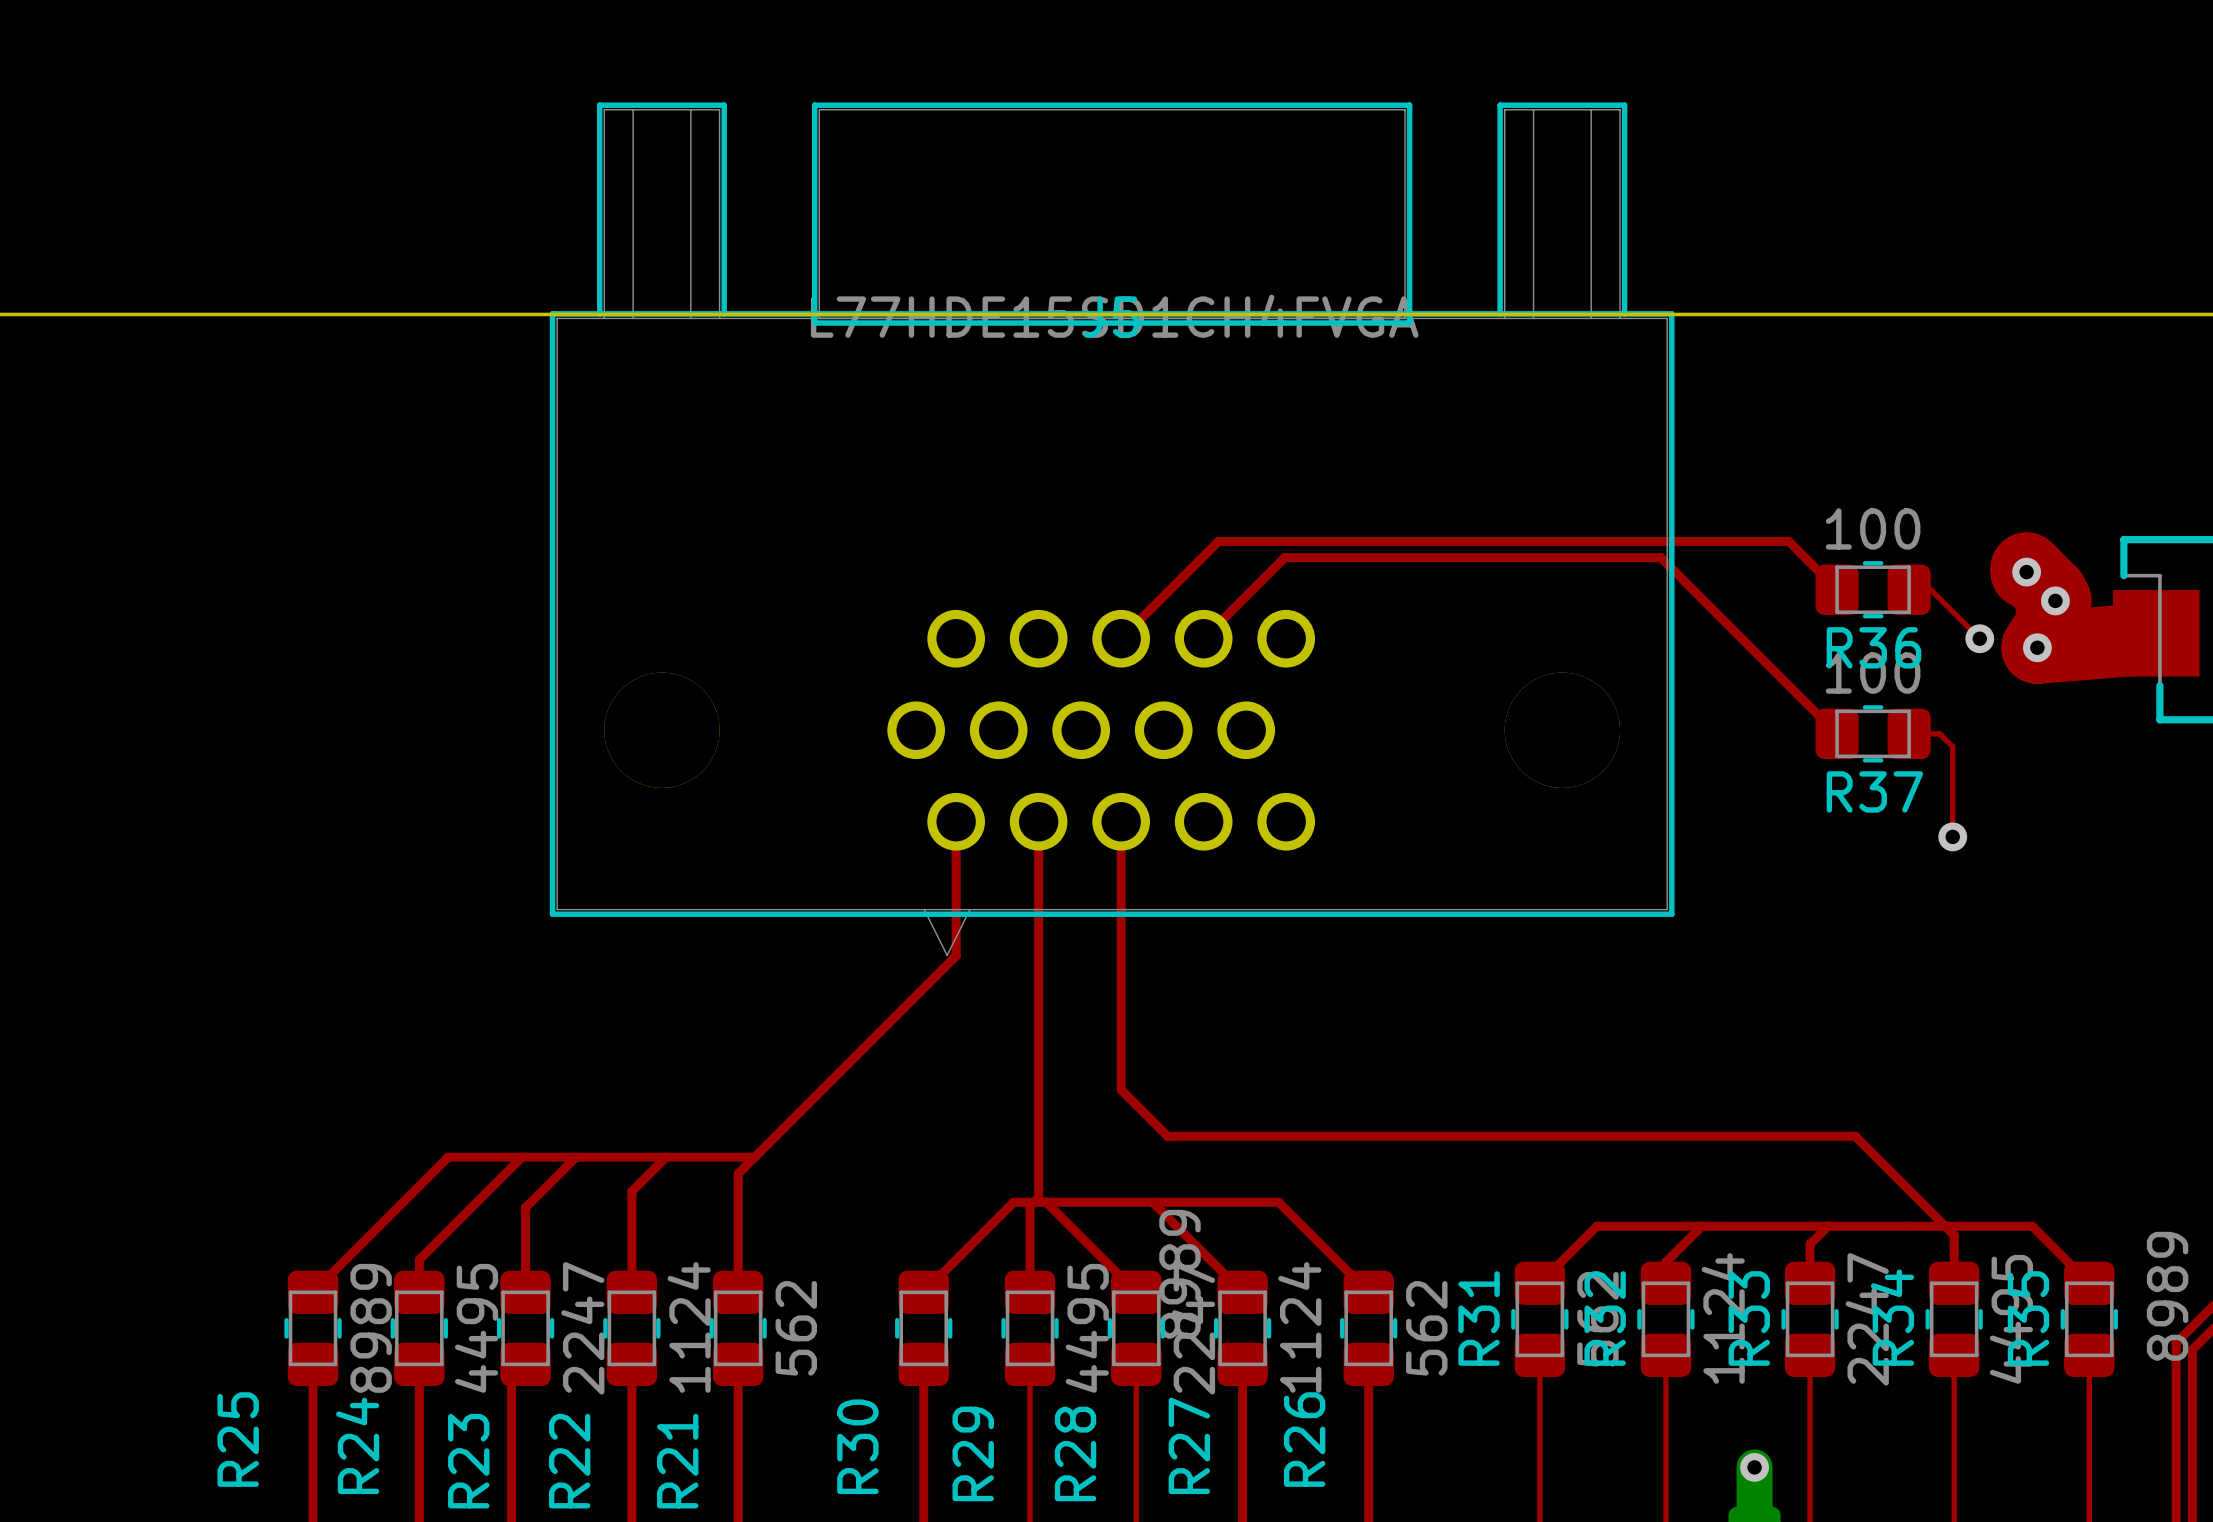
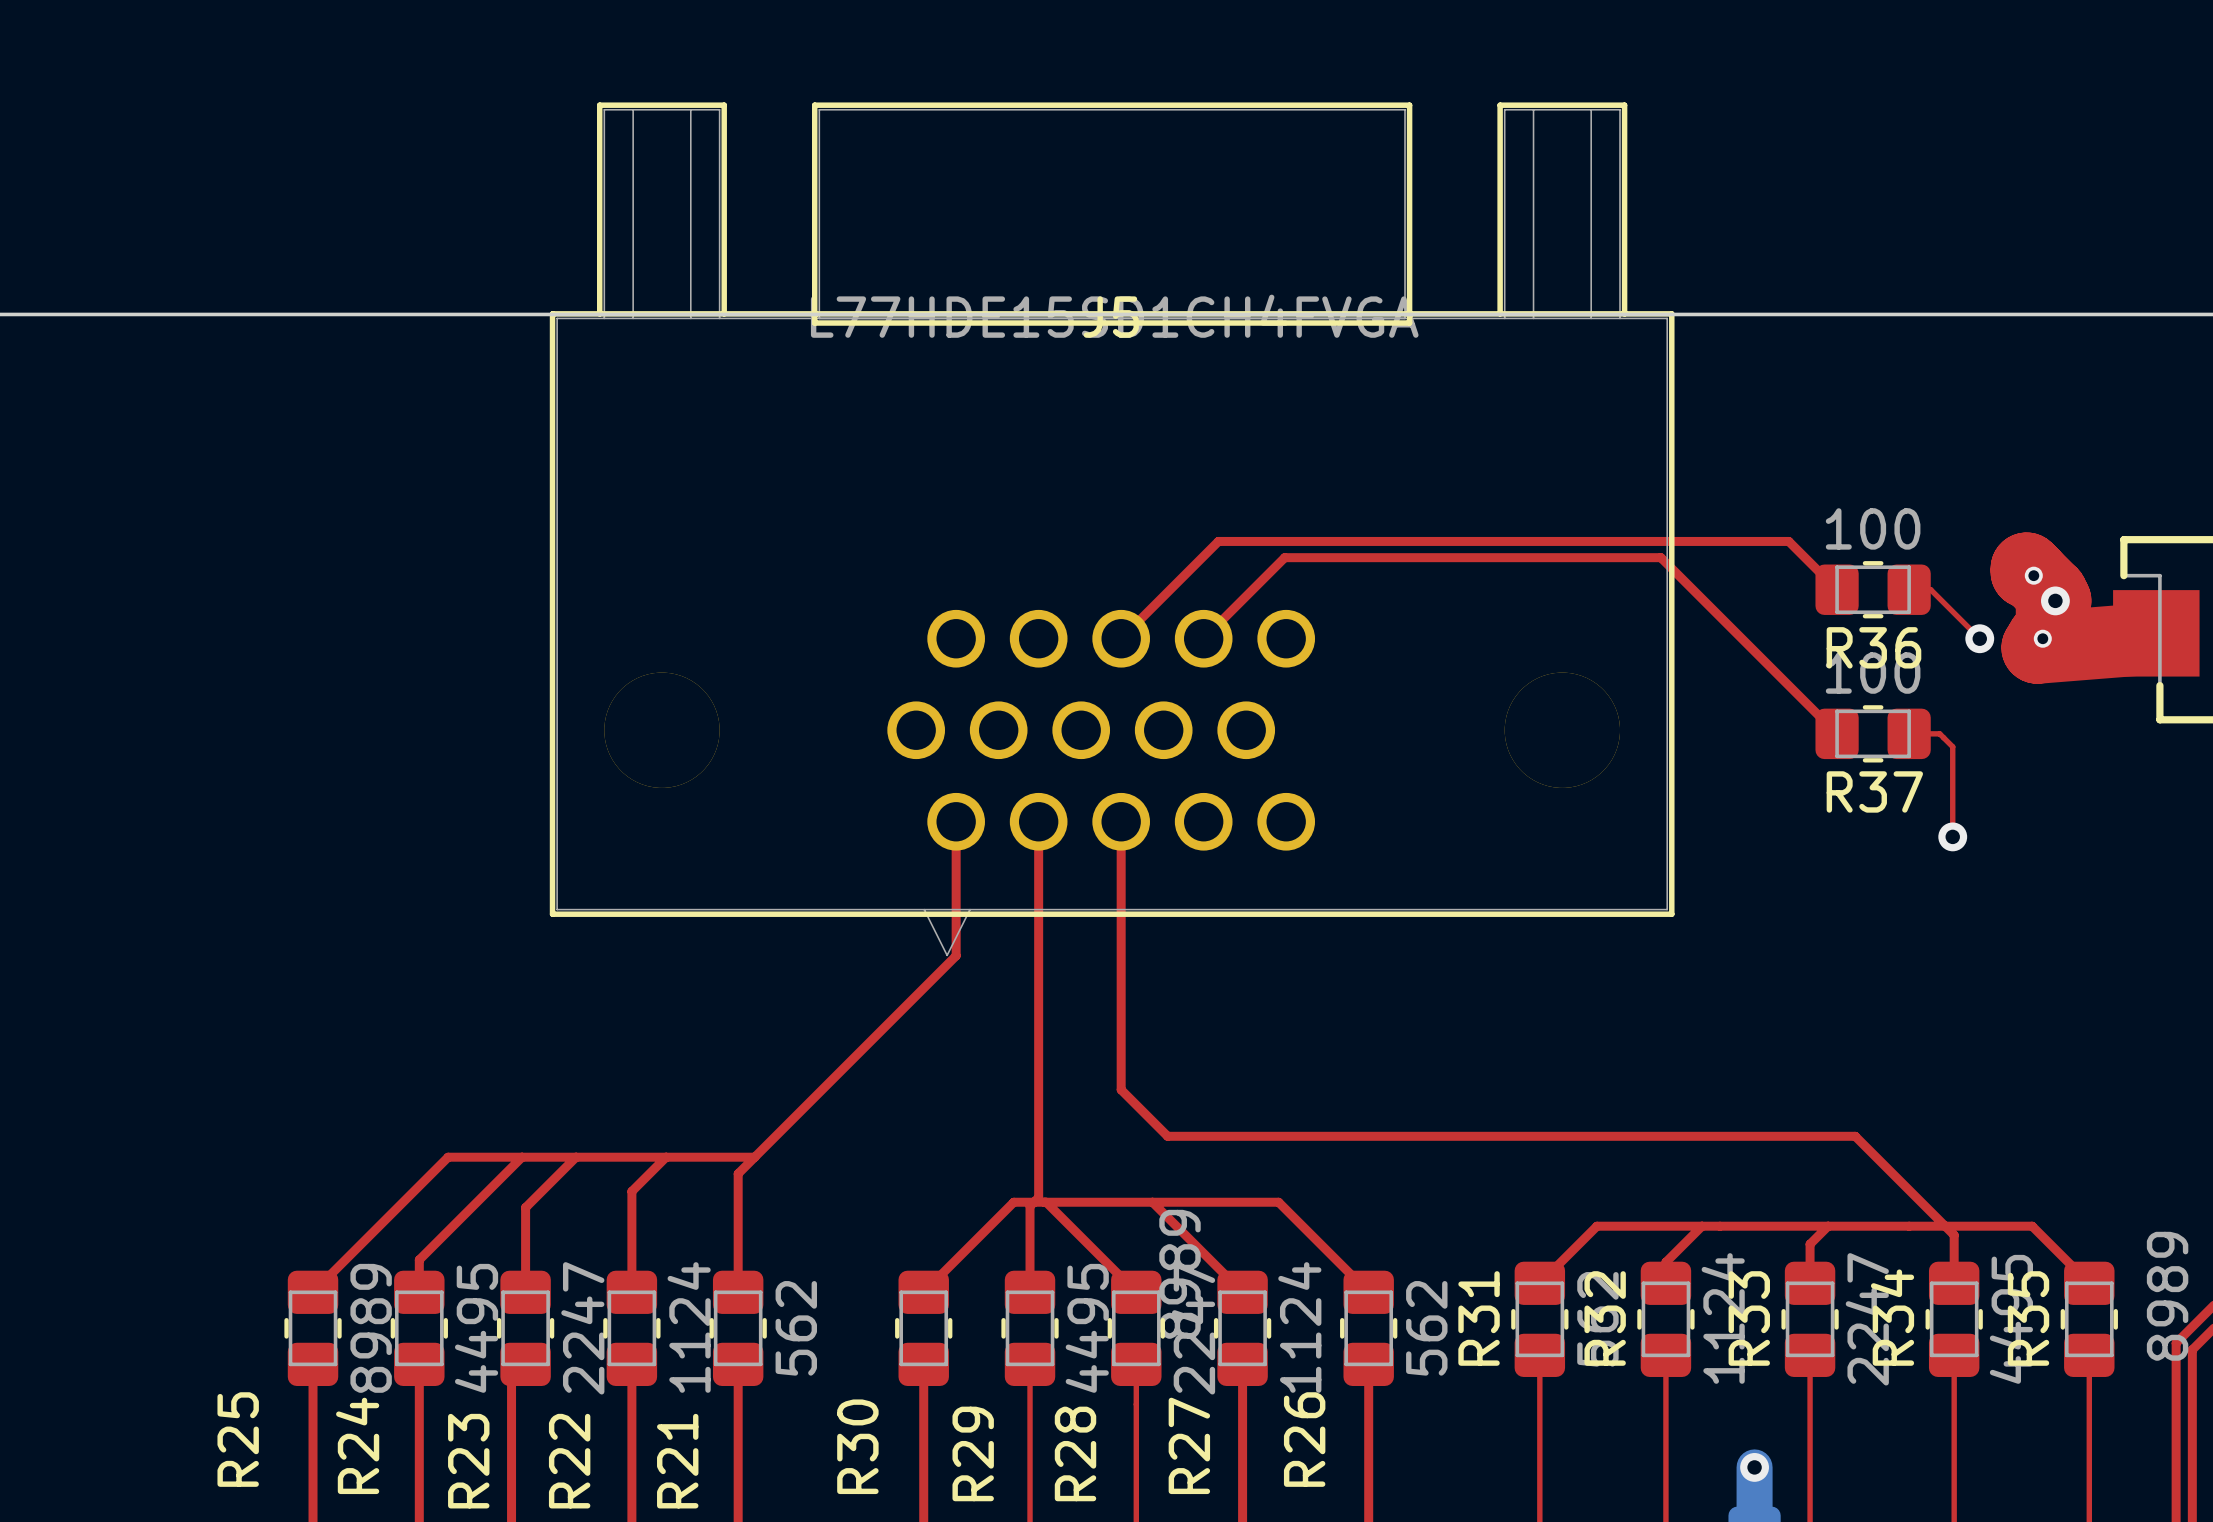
via size: [2012, 557, 2042, 587] -> [2024, 566, 2043, 585]
via size: [2023, 633, 2052, 663] -> [2033, 629, 2052, 648]

